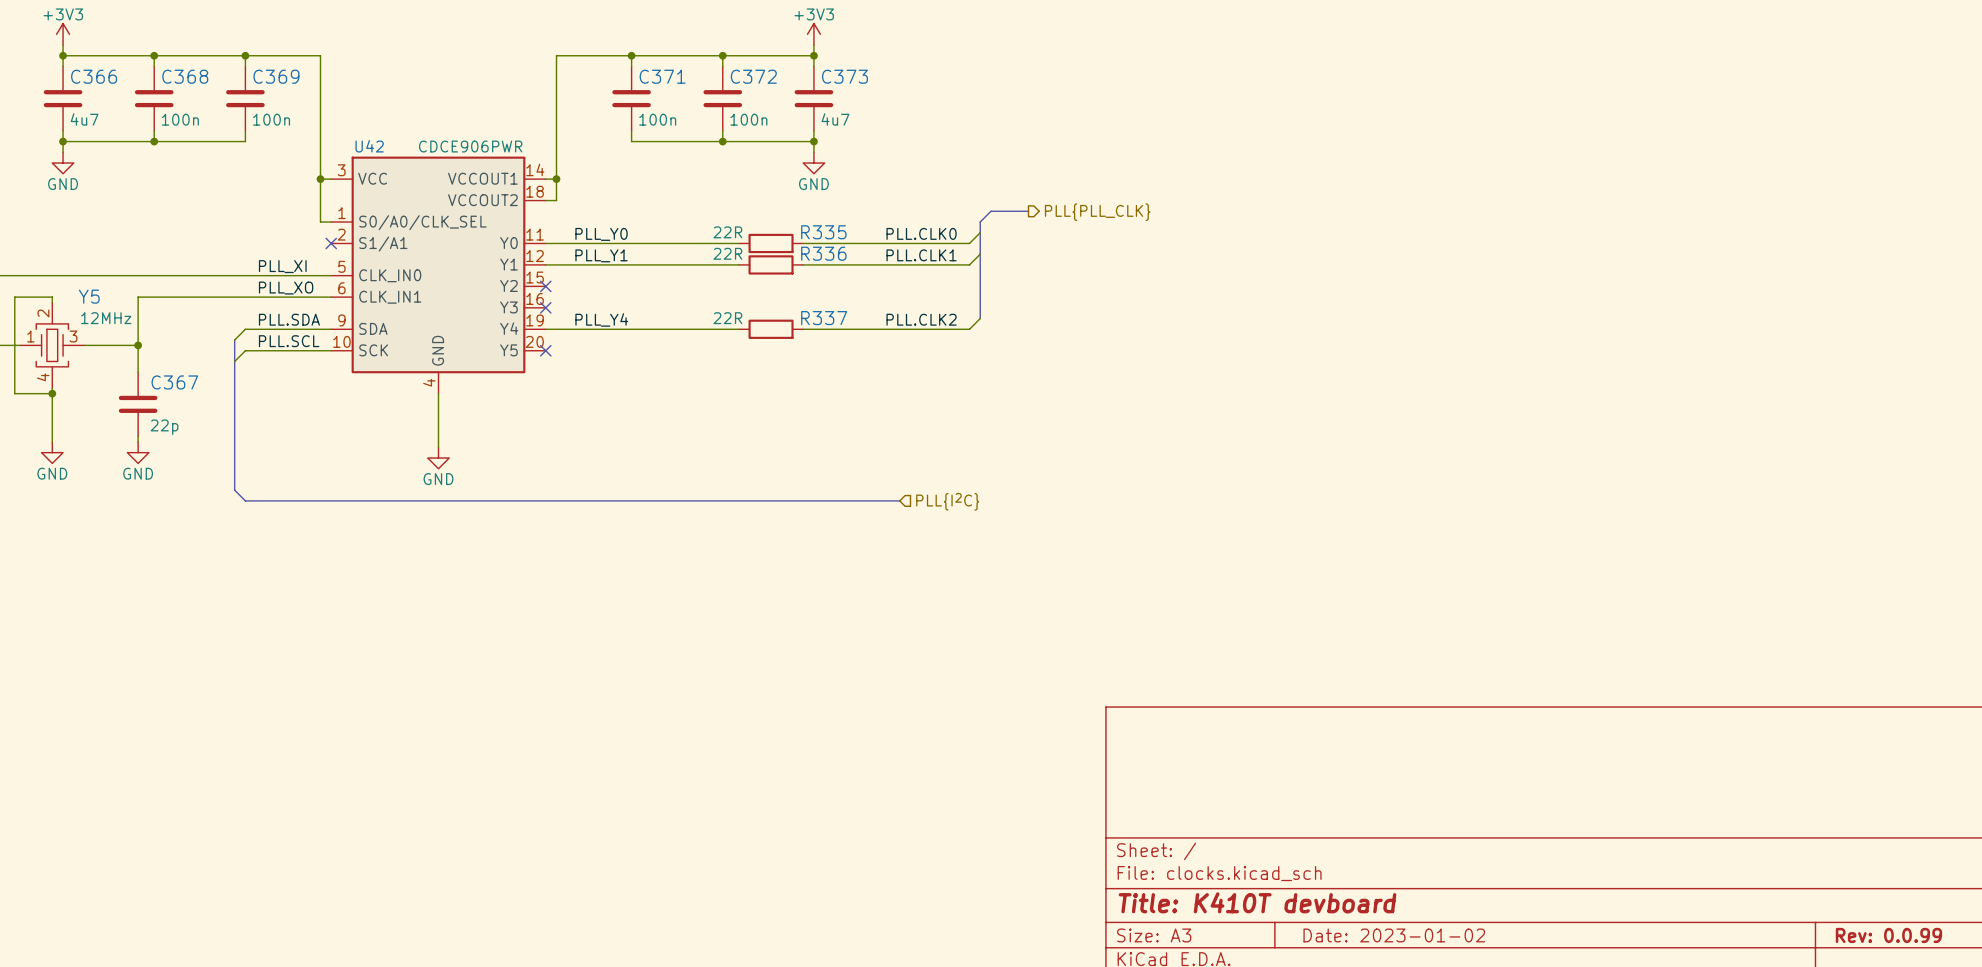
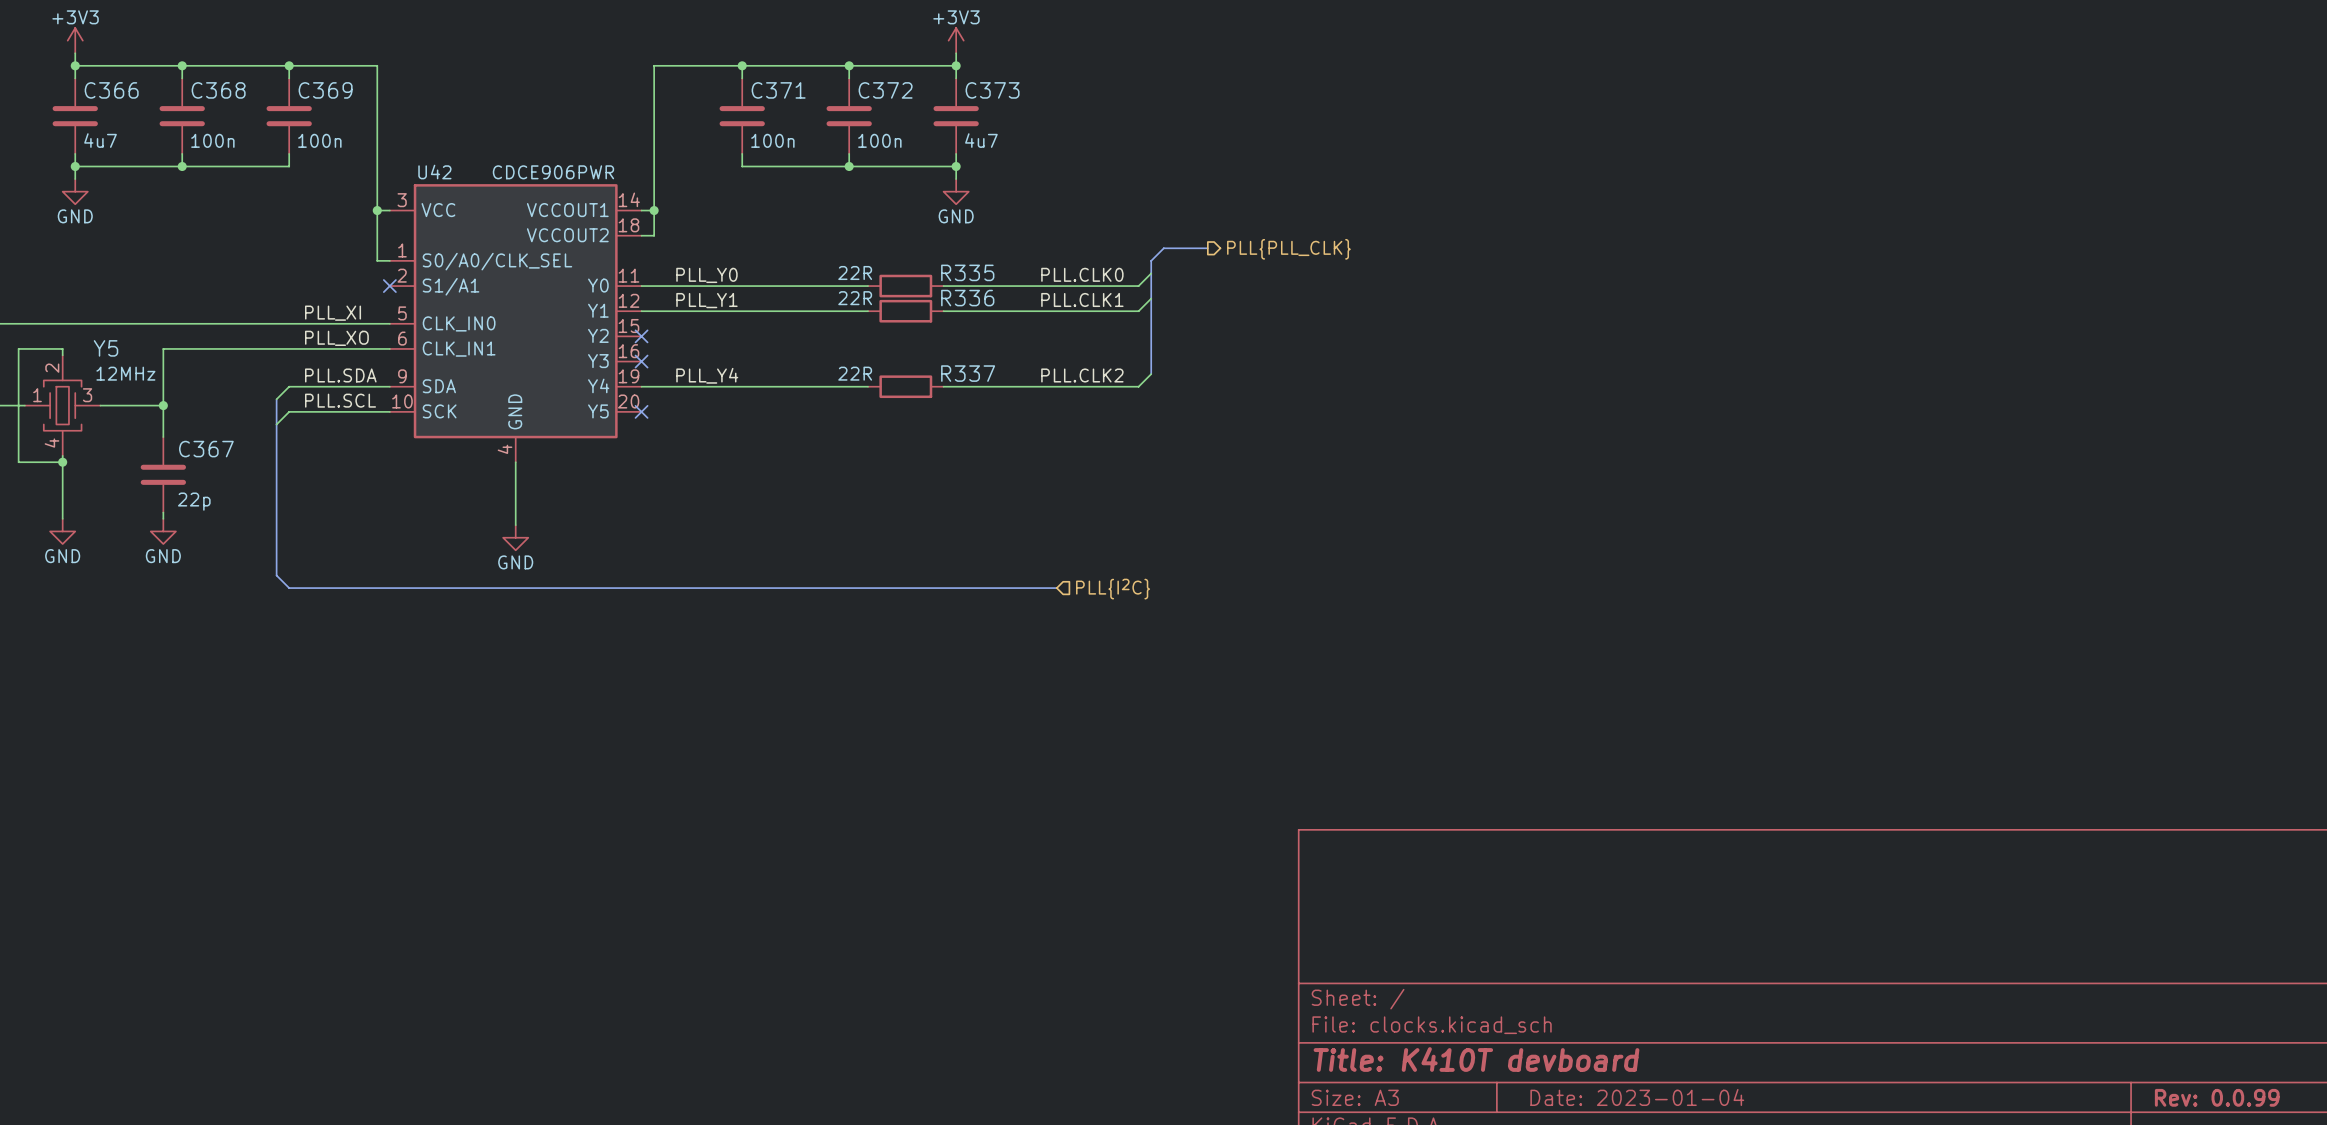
title block: Date: 2023-01-02 (1394, 935) -> Date: 2023-01-04 (1637, 1097)

